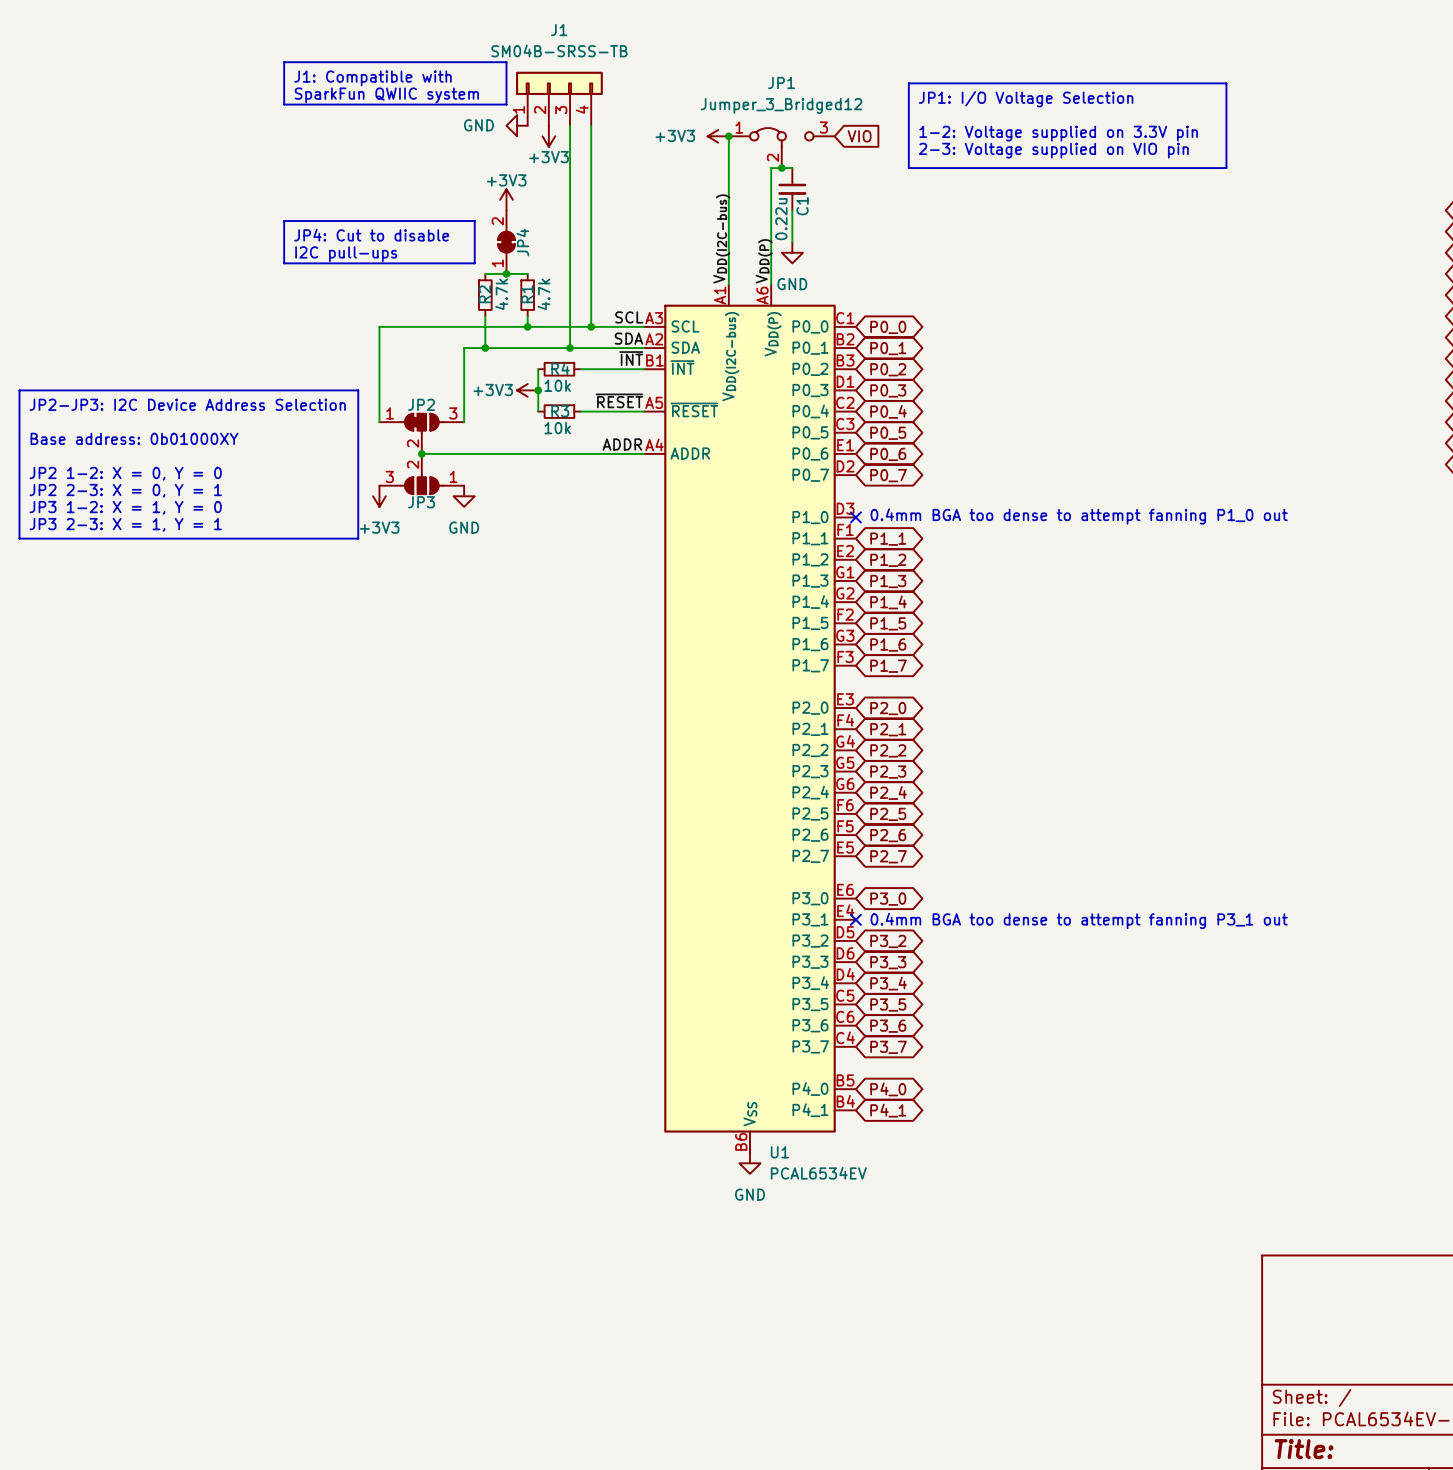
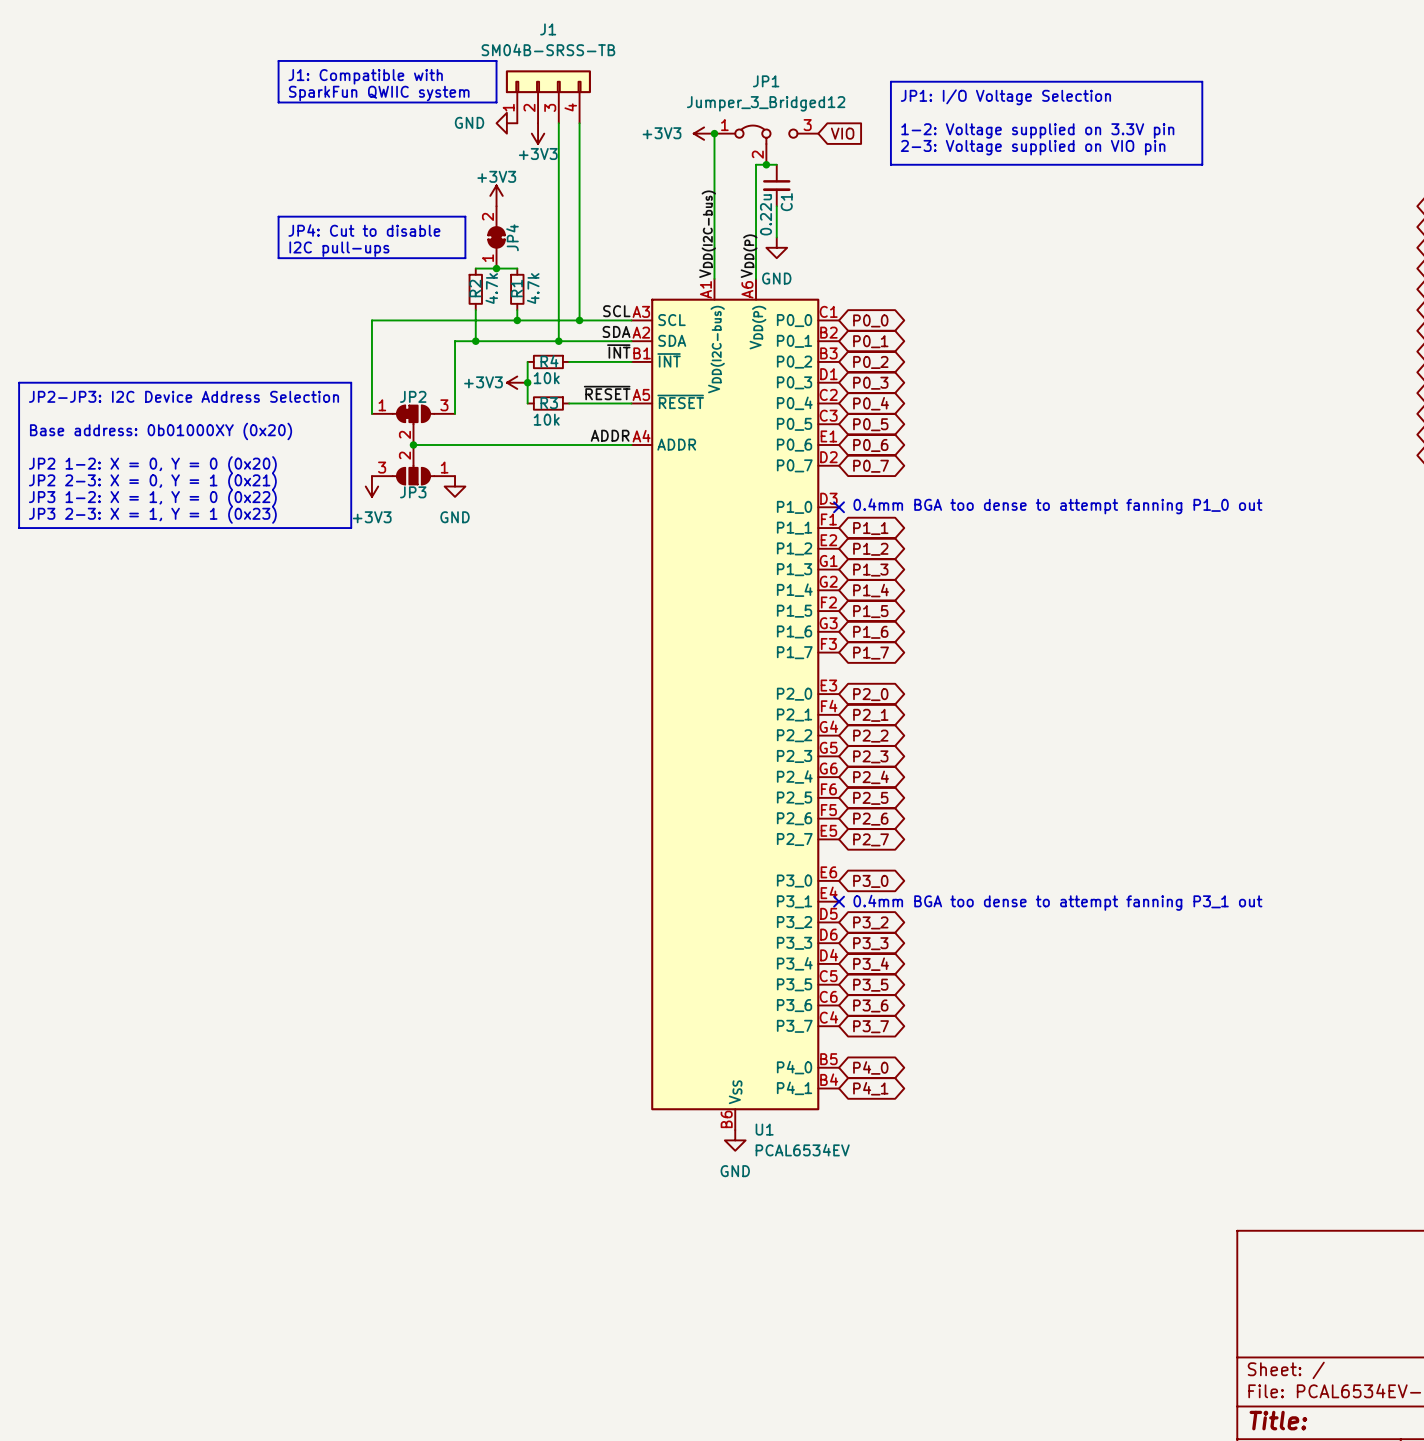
text: Base address: 0b01000XY (134, 438) -> Base address: 0b01000XY (0x20) (161, 431)
text: JP2 1-2: X = 0, Y = 0 (125, 473) -> JP2 1-2: X = 0, Y = 0 (0x20) (152, 464)
text: JP2 2-3: X = 0, Y = 1 (125, 490) -> JP2 2-3: X = 0, Y = 1 (0x21) (152, 481)
text: JP3 1-2: X = 1, Y = 0 (125, 507) -> JP3 1-2: X = 1, Y = 0 (0x22) (152, 498)
text: JP3 2-3: X = 1, Y = 1 (125, 524) -> JP3 2-3: X = 1, Y = 1 (0x23) (152, 515)

